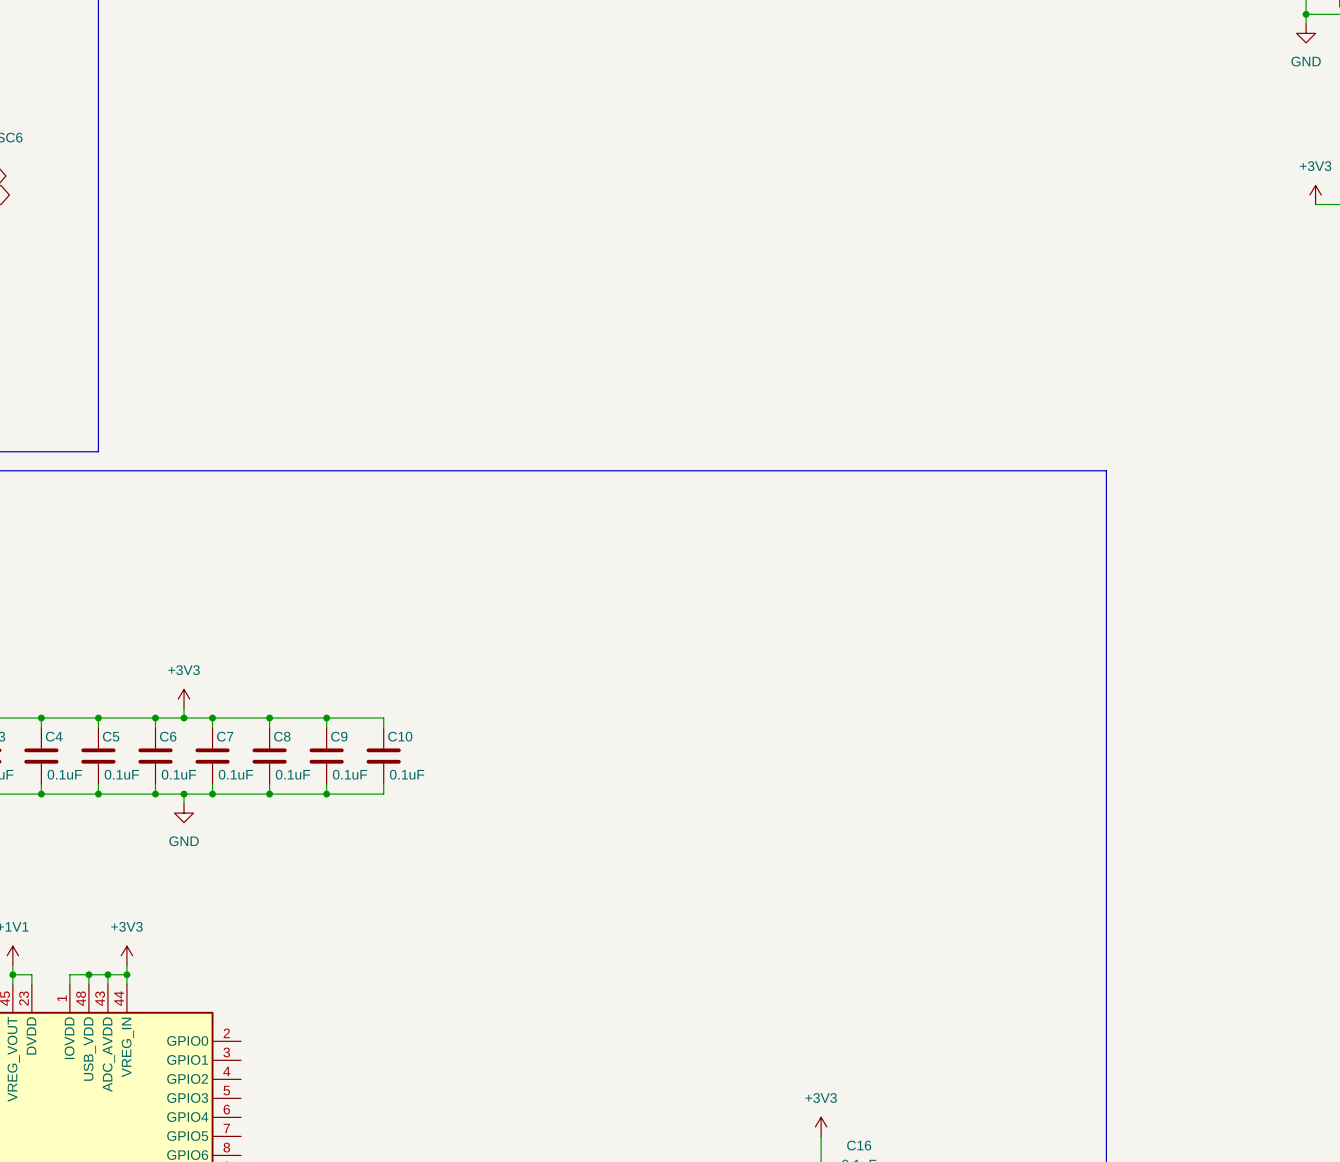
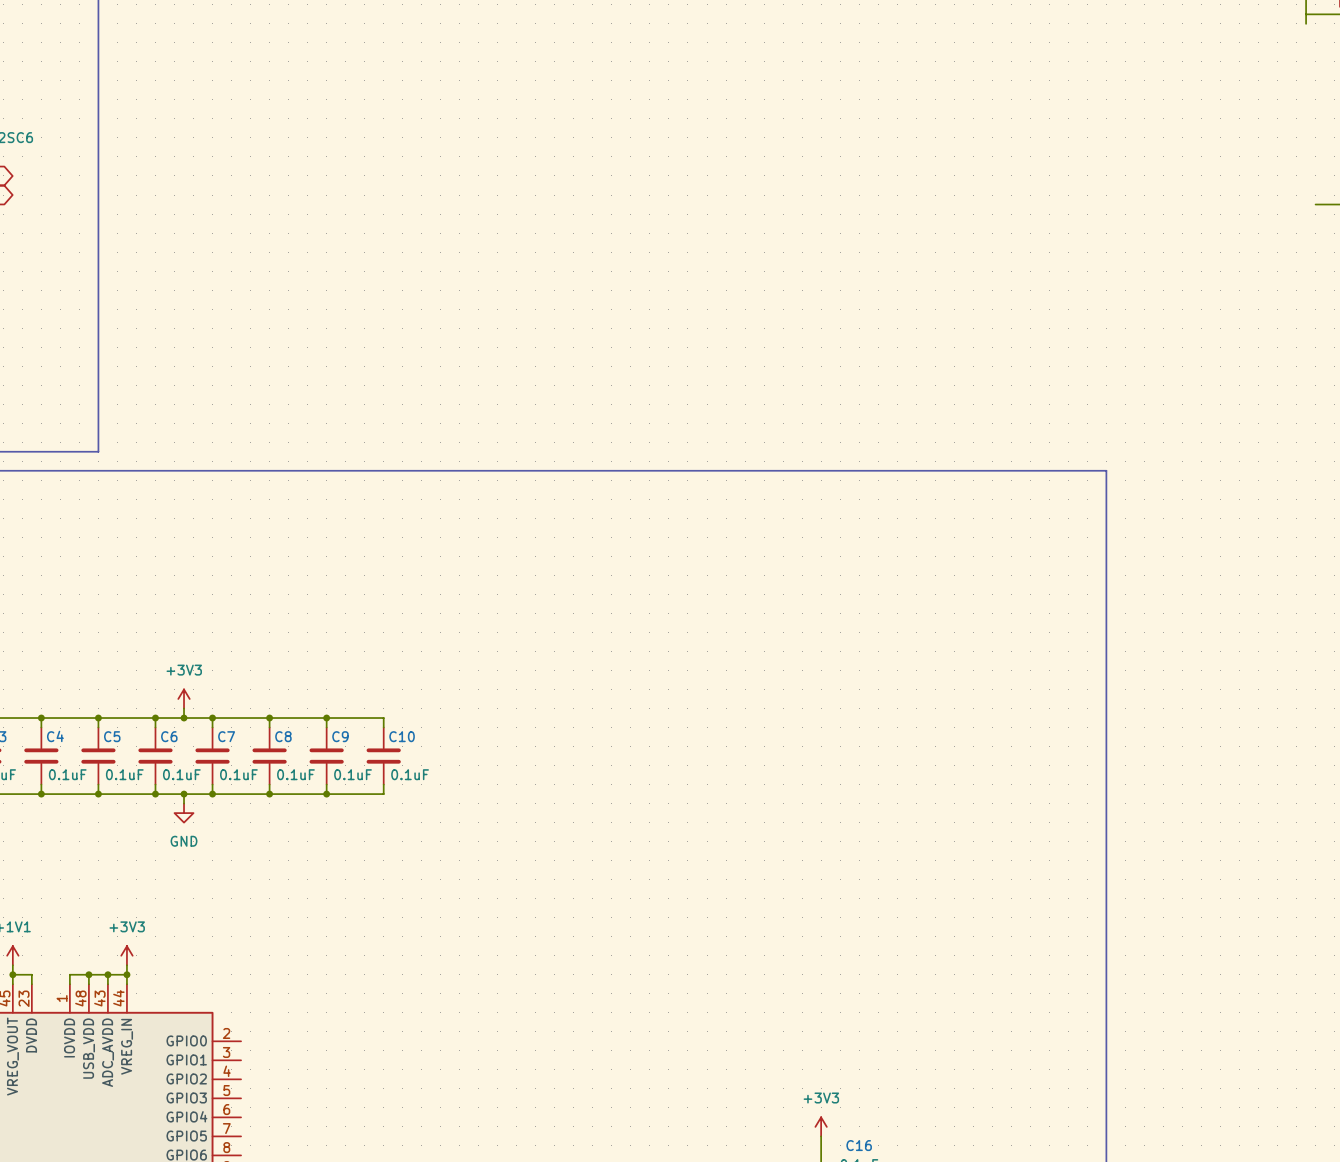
junction: (1306, 14) -> none
power symbol: GND (1306, 33) -> none
power symbol: +3V3 (1315, 195) -> none

